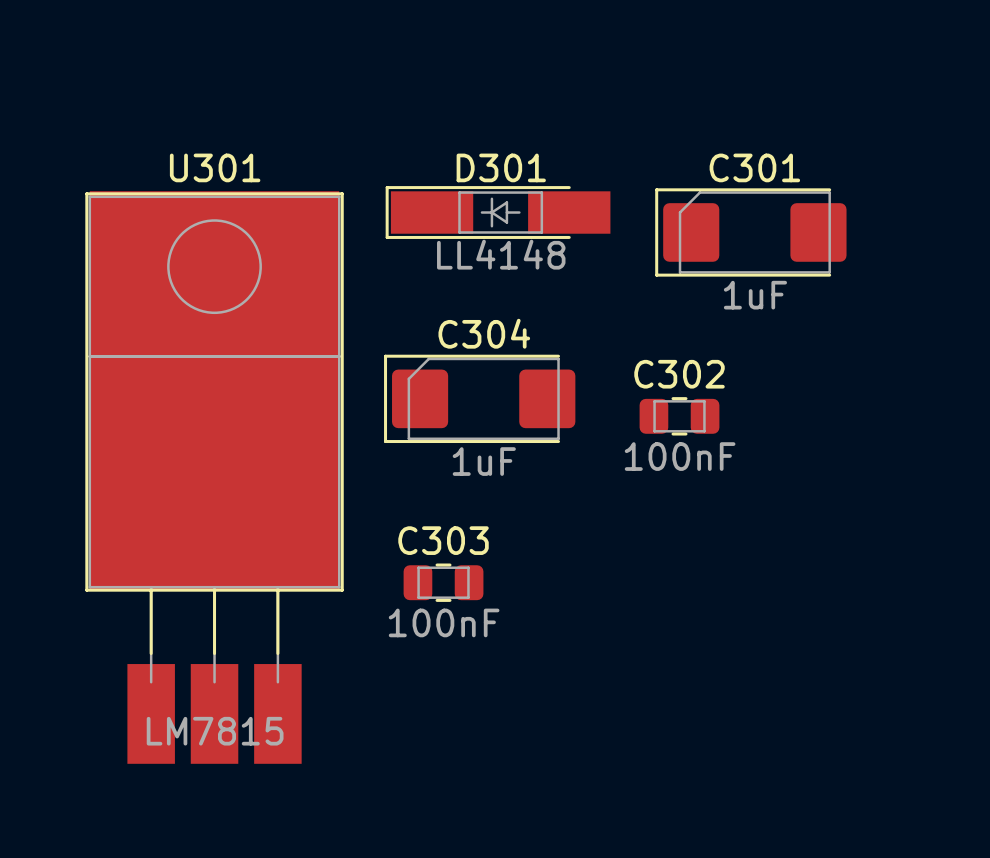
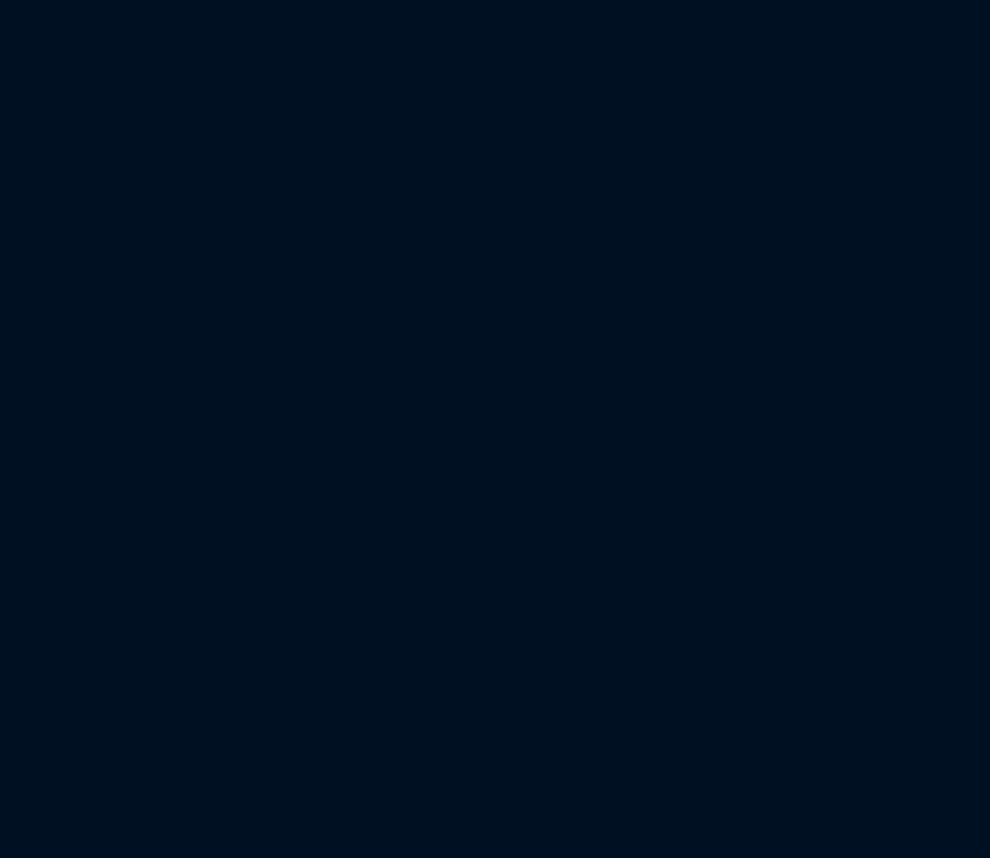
D301: LL4148 (498, 212) -> none
C301: 1uF (750, 232) -> none
C304: 1uF (479, 398) -> none
C302: 100nF (679, 416) -> none
U301: LM7815 (214, 477) -> none
C303: 100nF (443, 582) -> none

